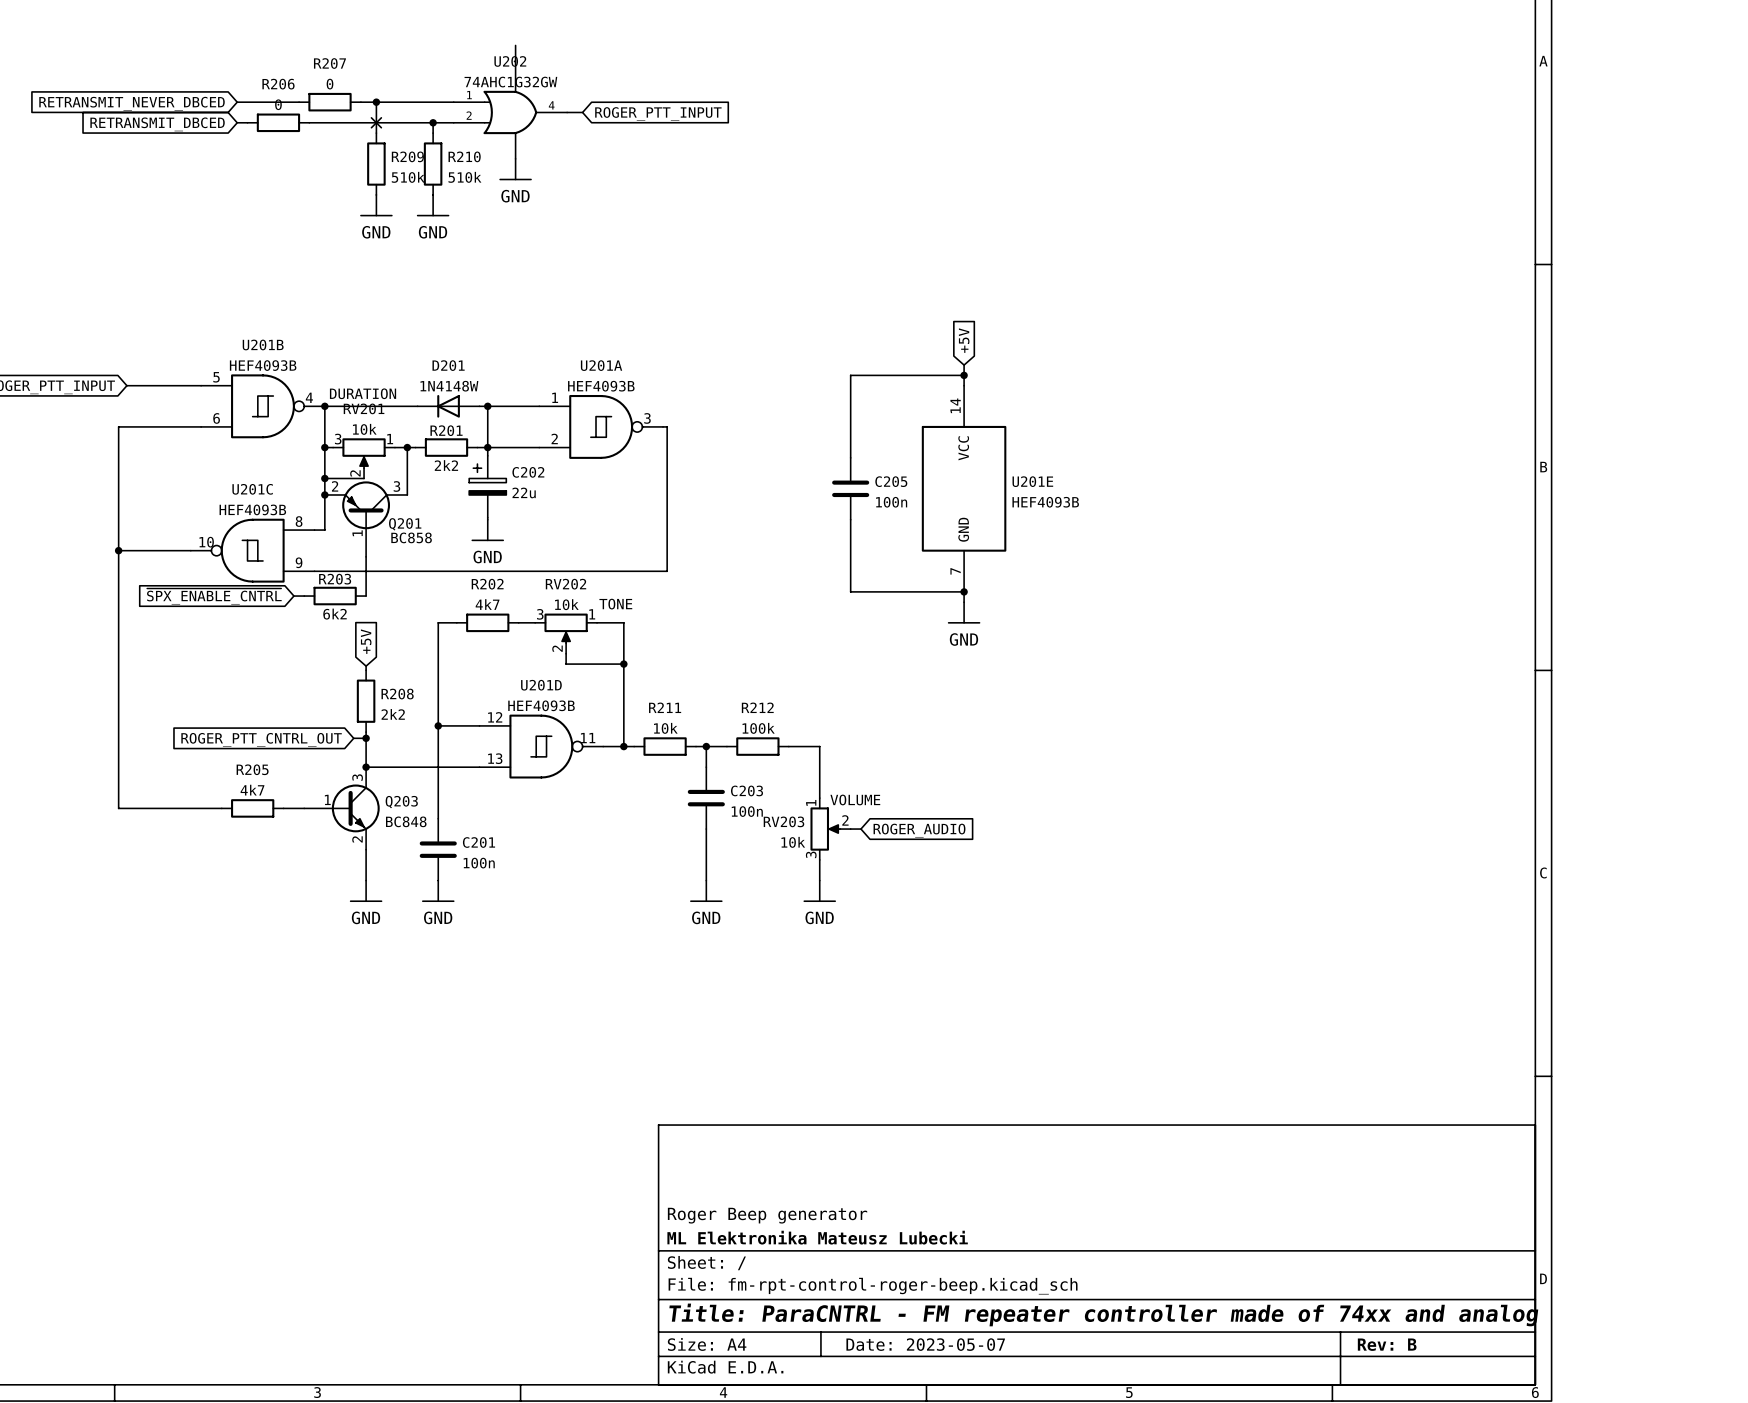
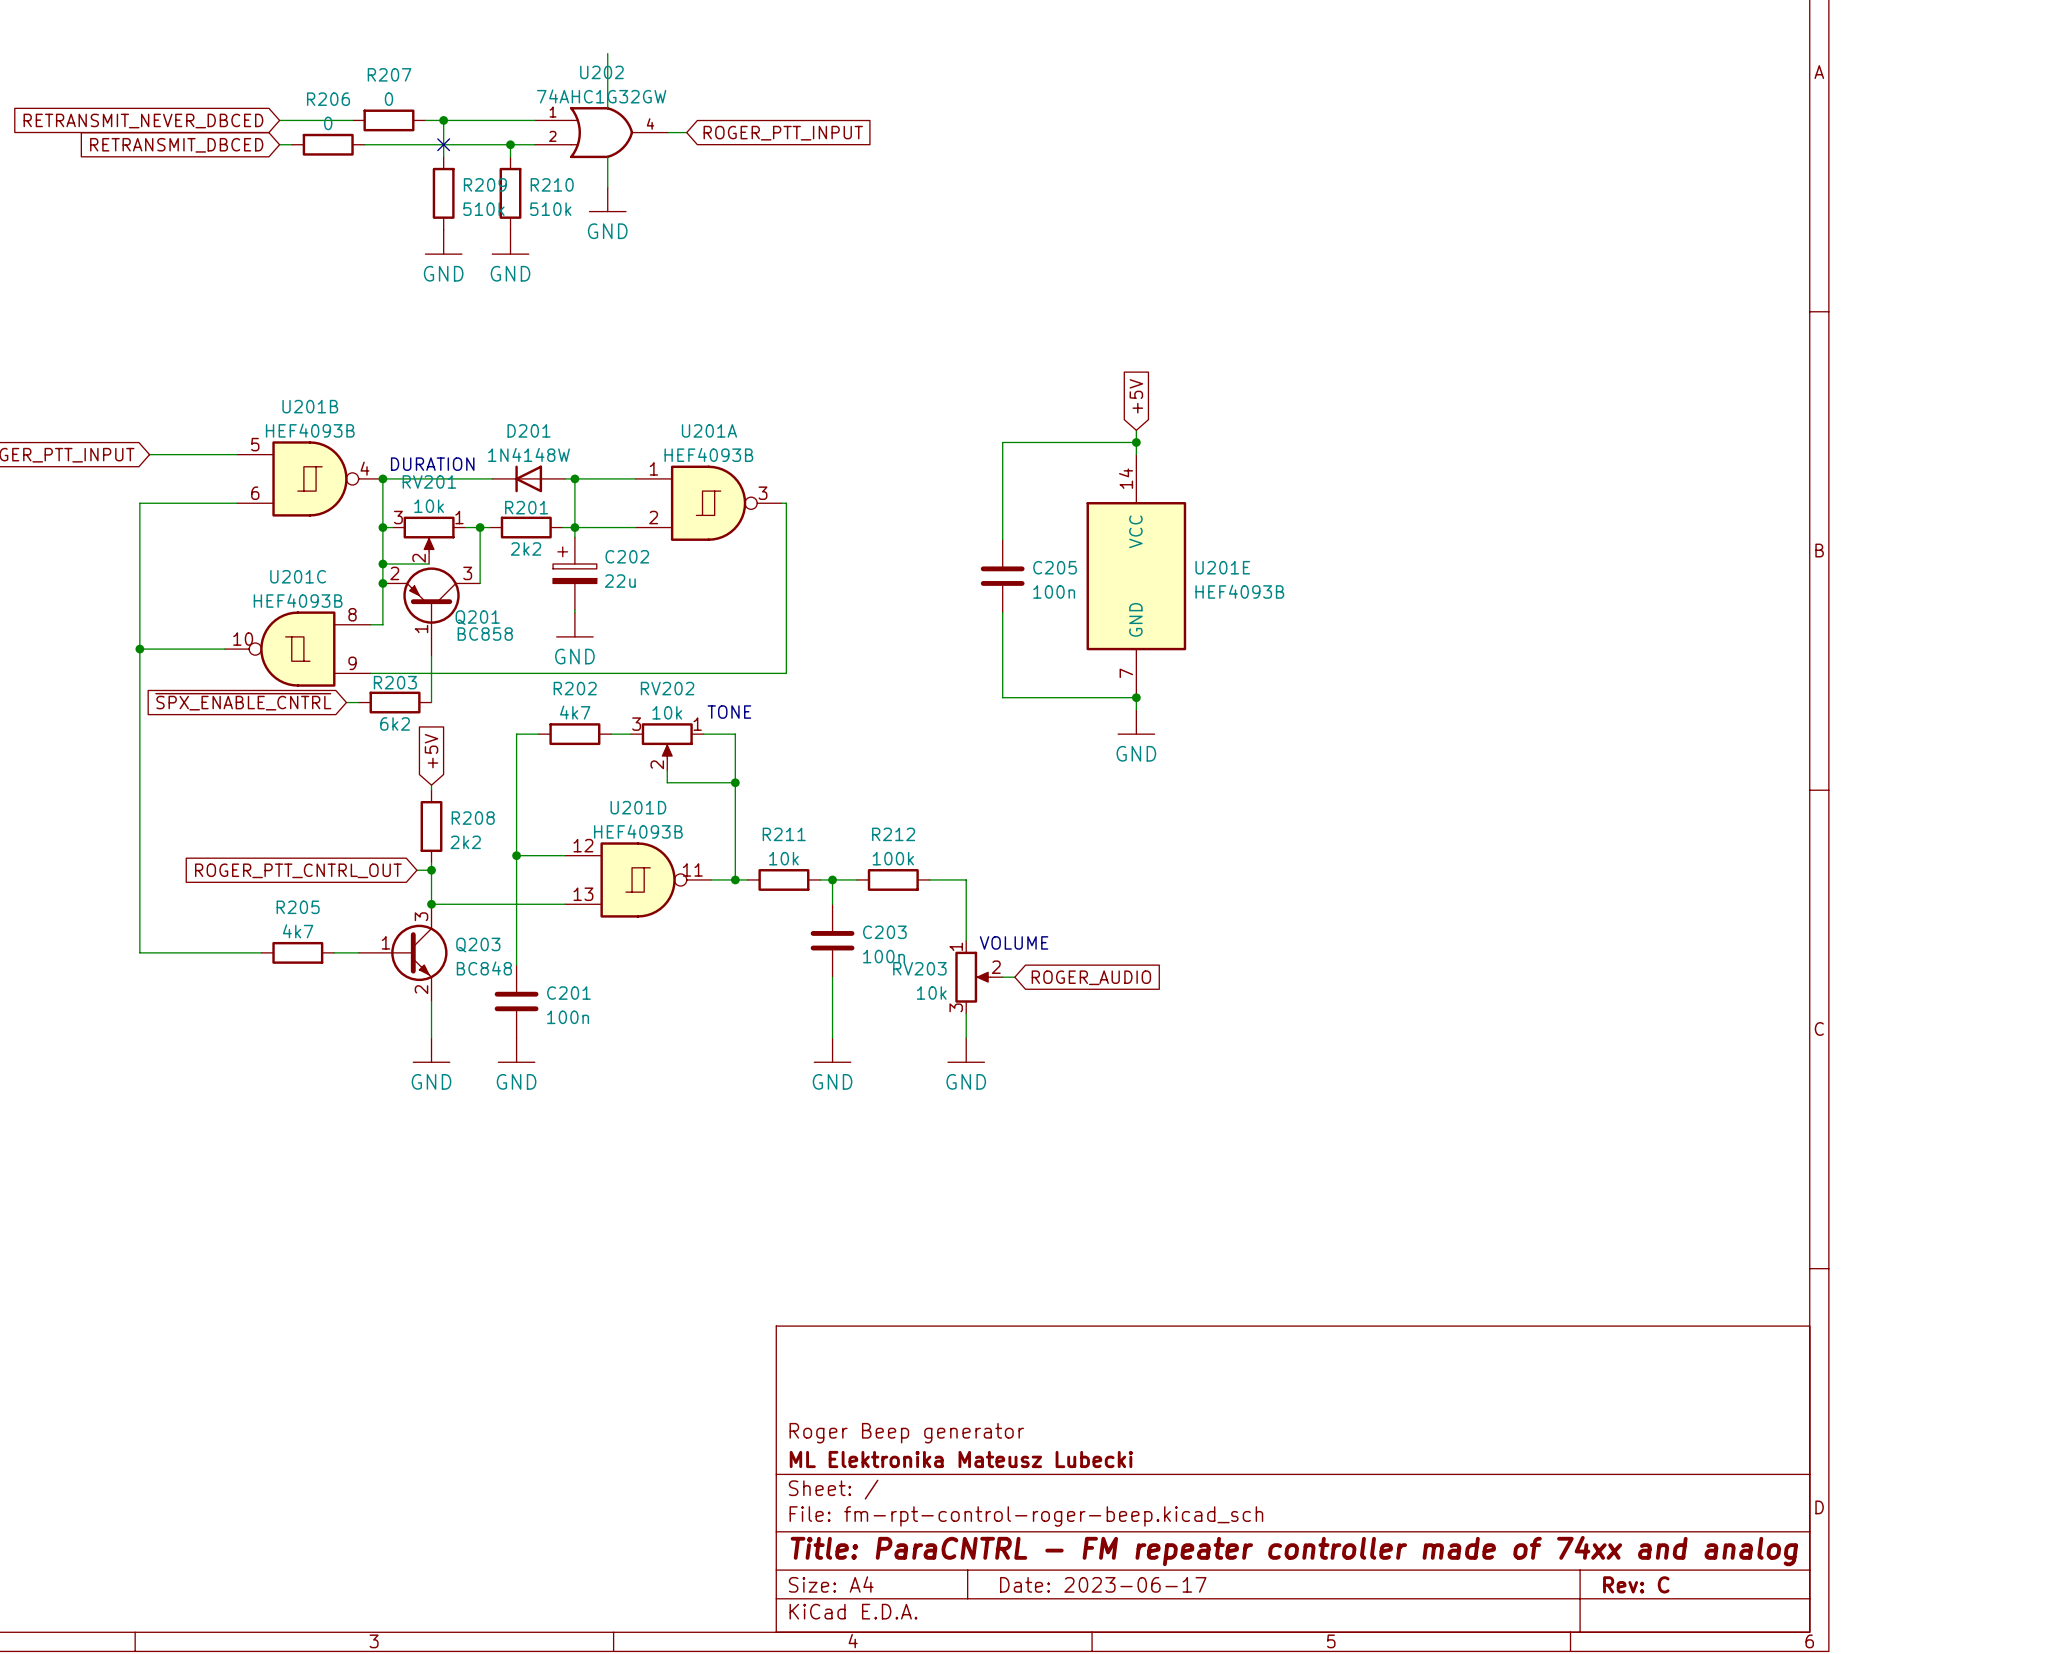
title block: Date: 2023-05-07 (925, 1344) -> Date: 2023-06-17 (1103, 1584)
title block: Rev: B (1387, 1344) -> Rev: C (1636, 1584)

